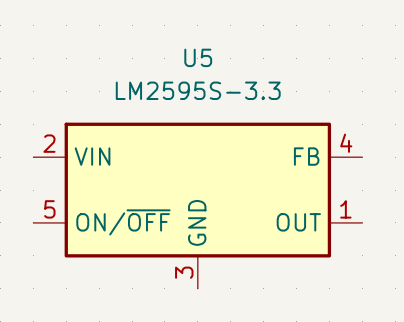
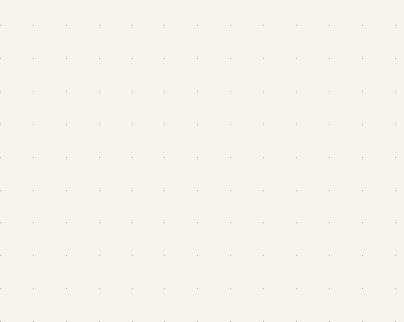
U5: LM2595S-3.3 (197, 205) -> none

